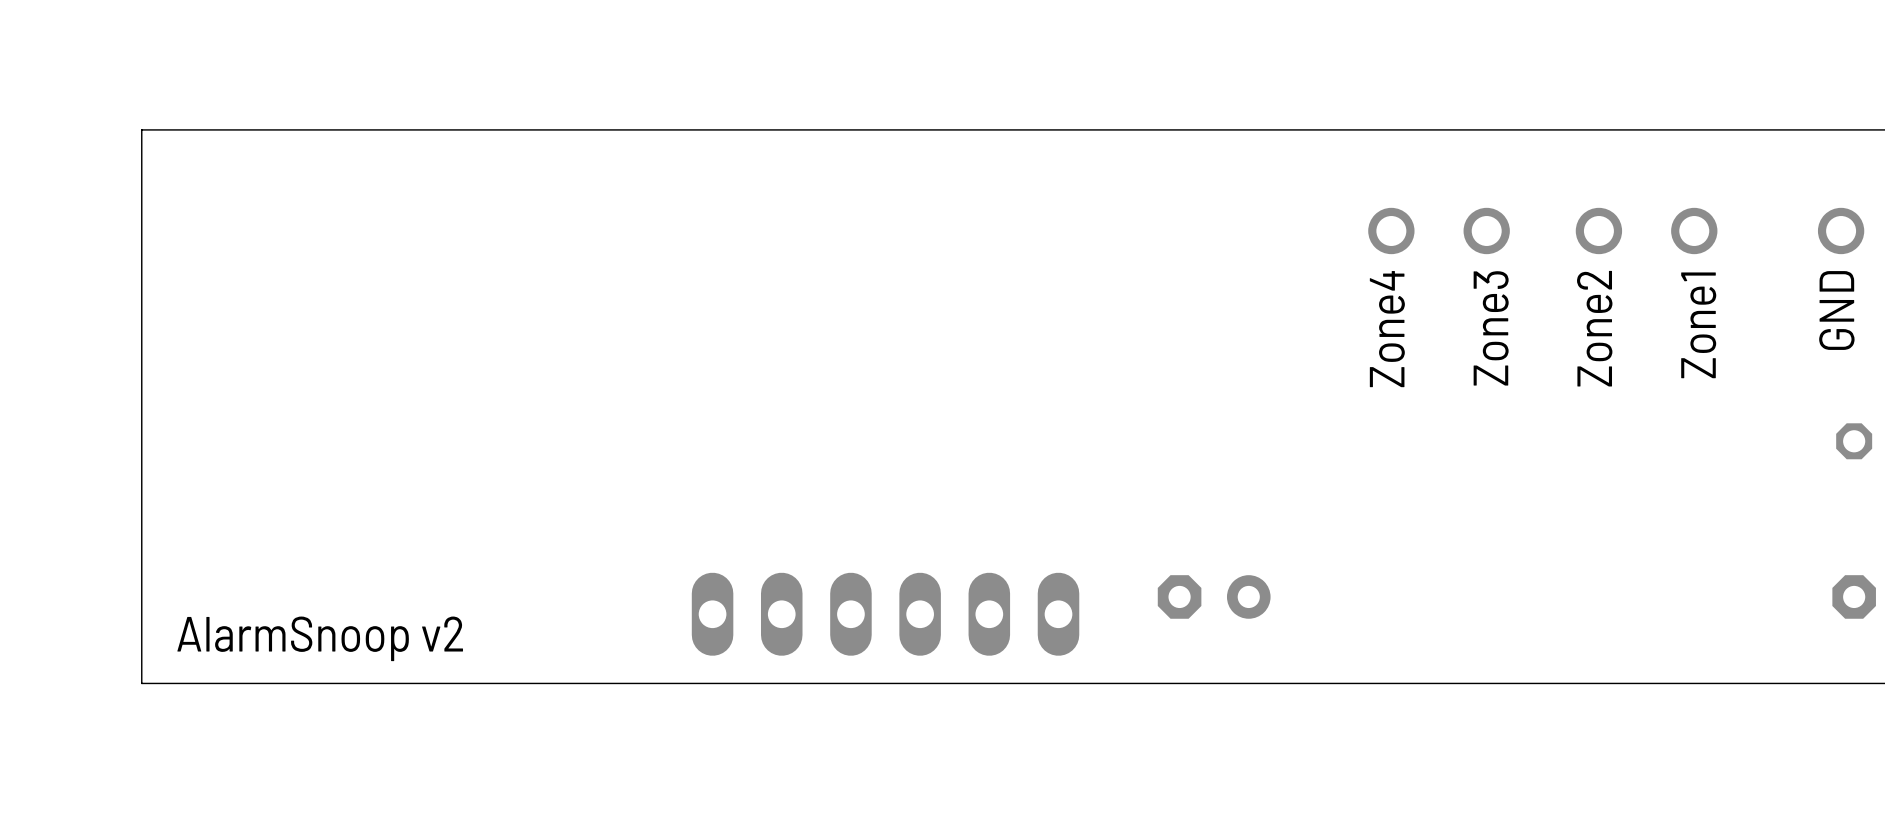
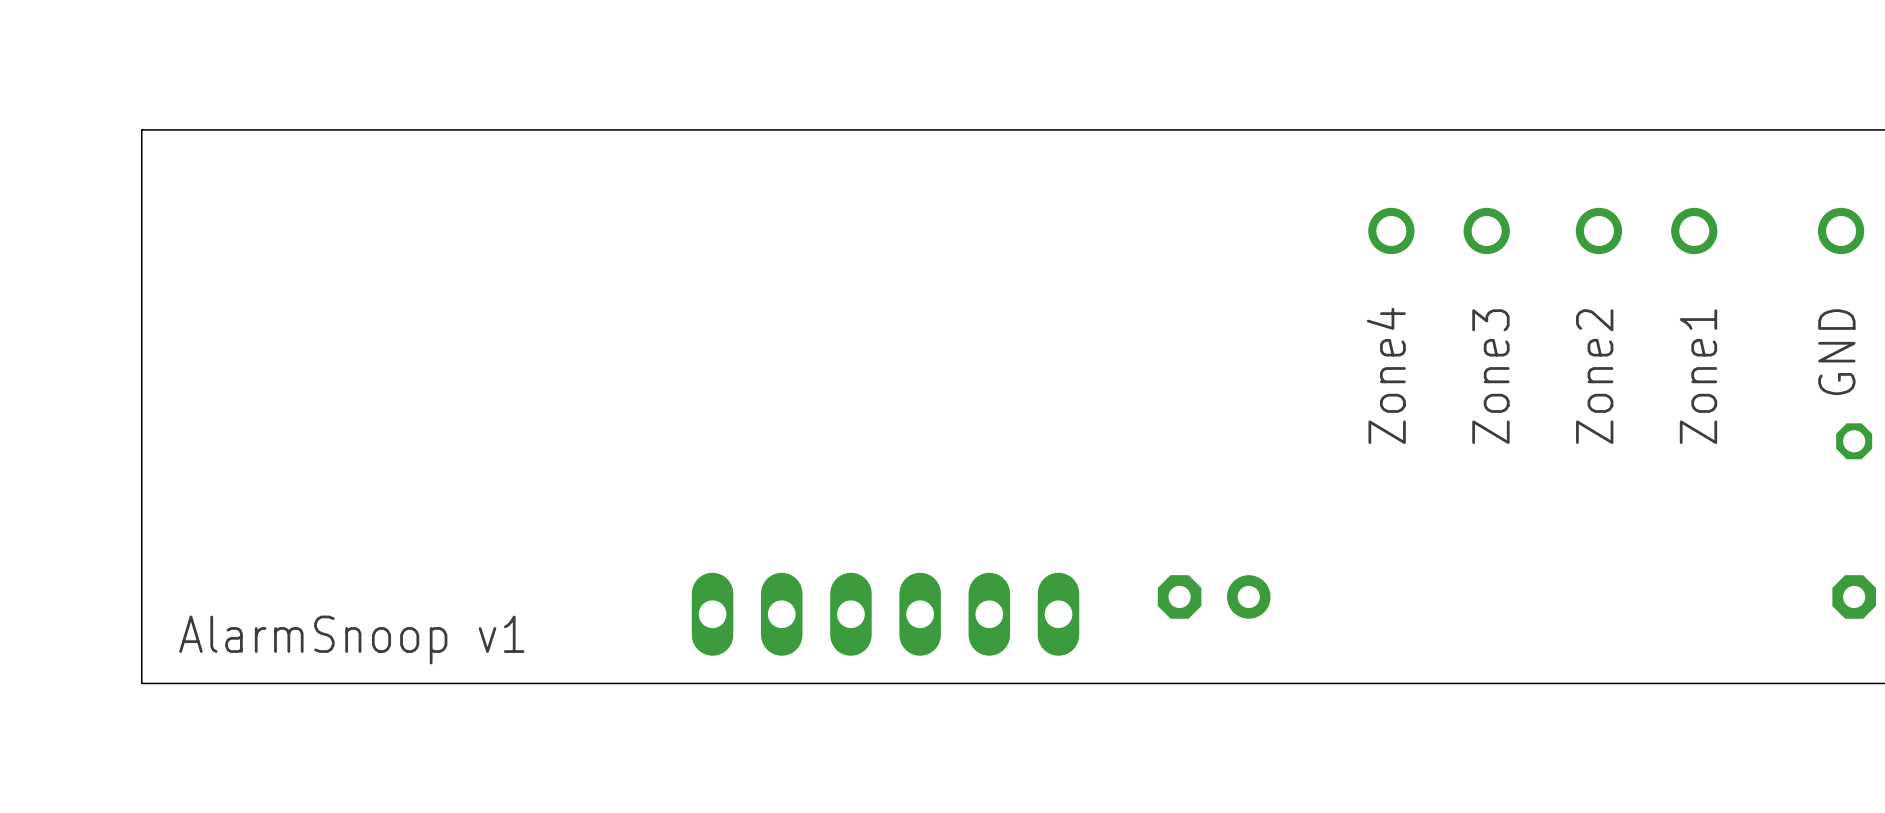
text position: GND (1836, 310) -> GND (1836, 352)
text position: Zone1 (1698, 325) -> Zone1 (1698, 376)
text position: Zone3 (1491, 328) -> Zone3 (1490, 376)
text position: Zone2 (1594, 328) -> Zone2 (1594, 376)
text position: Zone4 (1387, 329) -> Zone4 (1386, 375)
text: AlarmSnoop v2 (320, 638) -> AlarmSnoop v1 (351, 640)

